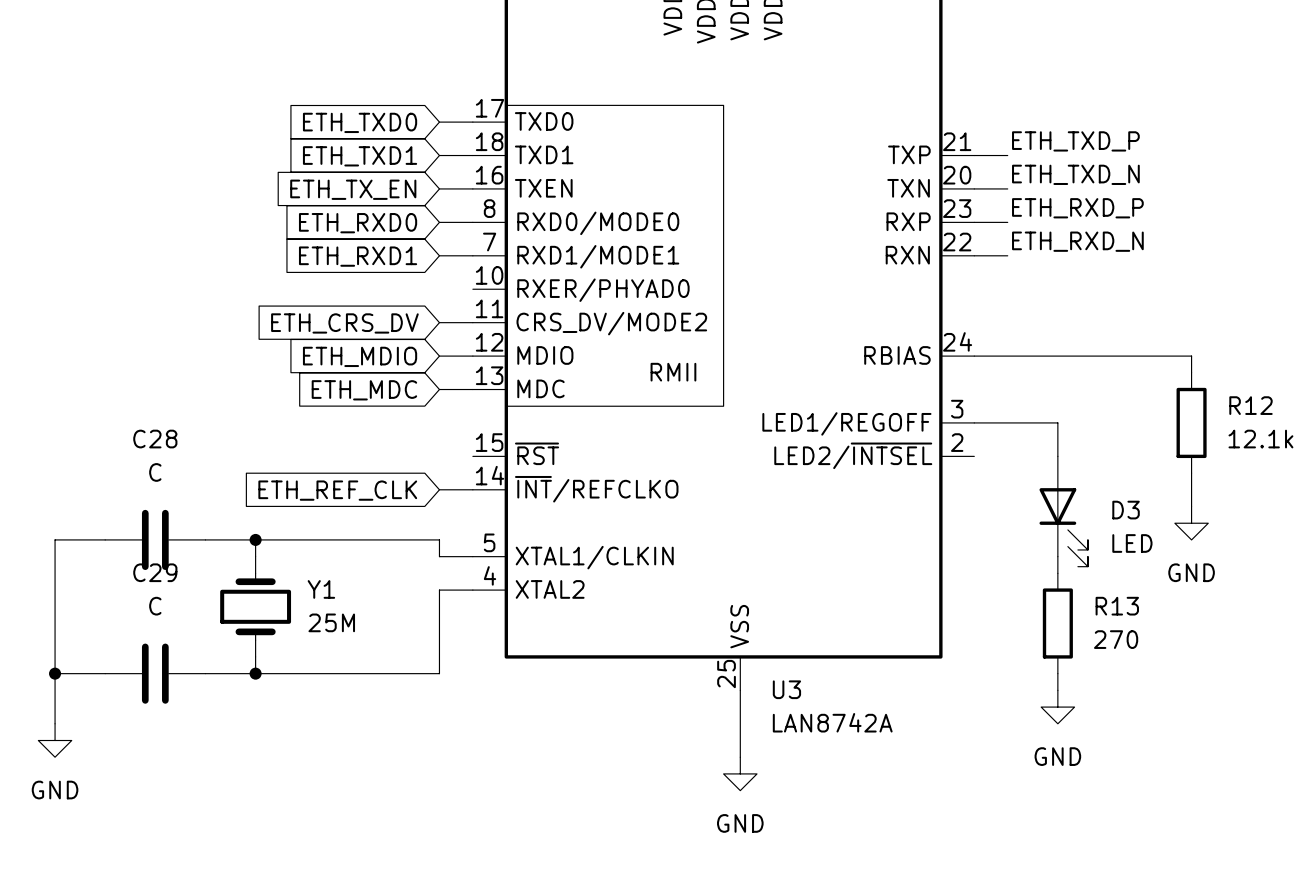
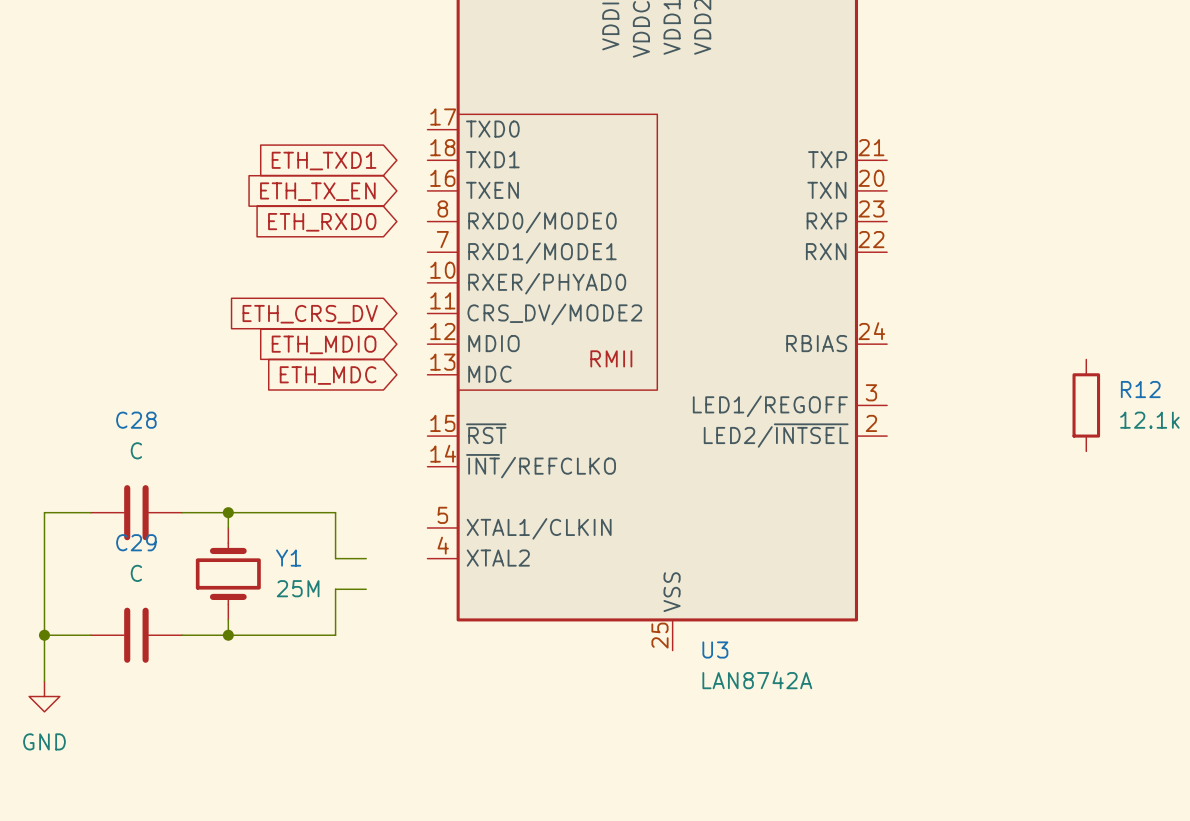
global label: ETH_TXD0 (360, 122) -> none
wire: (439, 122) (472, 122) -> none
label: ETH_TXD_P (1075, 141) -> none
wire: (439, 155) (472, 155) -> none
wire: (974, 155) (1007, 155) -> none
label: ETH_TXD_N (1075, 174) -> none
wire: (439, 188) (472, 188) -> none
wire: (974, 188) (1007, 188) -> none
label: ETH_RXD_P (1077, 208) -> none
wire: (439, 222) (472, 222) -> none
wire: (974, 222) (1007, 222) -> none
label: ETH_RXD_N (1077, 241) -> none
wire: (439, 255) (472, 255) -> none
wire: (974, 255) (1007, 255) -> none
global label: ETH_RXD1 (358, 256) -> none
wire: (439, 322) (472, 322) -> none
wire: (439, 356) (472, 356) -> none
wire: (974, 356) (1191, 356) (1191, 372) -> none
wire: (439, 389) (472, 389) -> none
wire: (974, 422) (1057, 422) (1057, 456) -> none
wire: (1191, 473) (1191, 506) -> none
wire: (439, 489) (472, 489) -> none
global label: ETH_REF_CLK (337, 490) -> none
D3: LED (1063, 511) -> none
power symbol: GND (1191, 523) -> none
wire: (372, 539) (439, 539) (439, 556) (472, 556) -> (335, 512) (335, 558) (366, 558)
wire: (1057, 556) (1057, 573) -> none
wire: (472, 590) (439, 590) (439, 673) (372, 673) -> (366, 589) (335, 589) (335, 635)
R13: 270 (1057, 623) -> none
wire: (1057, 673) (1057, 690) -> none
wire: (740, 690) (740, 757) -> none
power symbol: GND (1057, 707) -> none
power symbol: GND (740, 773) -> none

